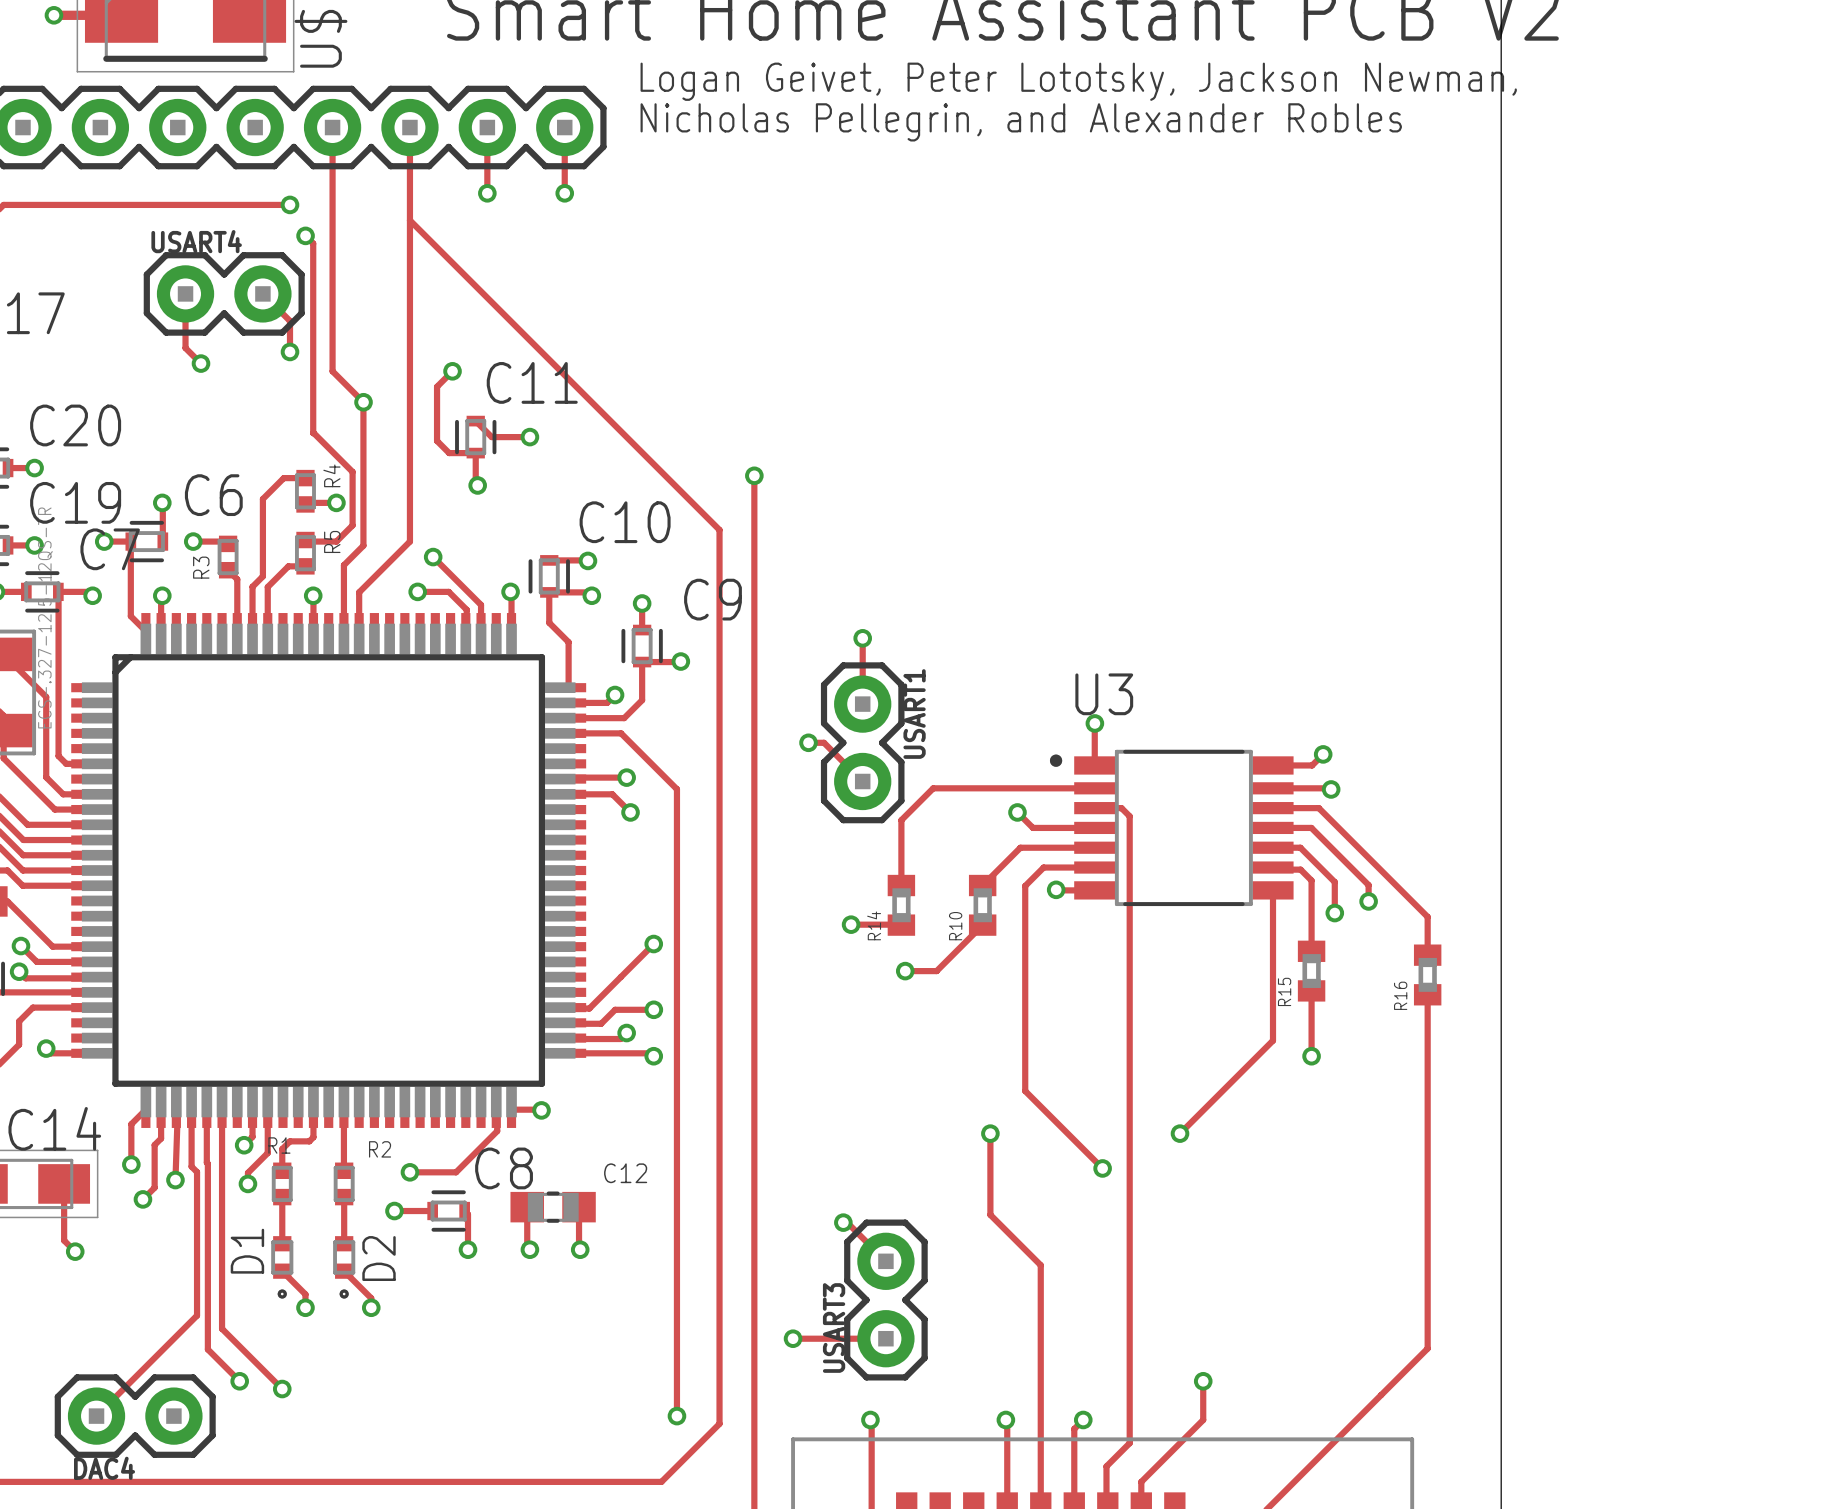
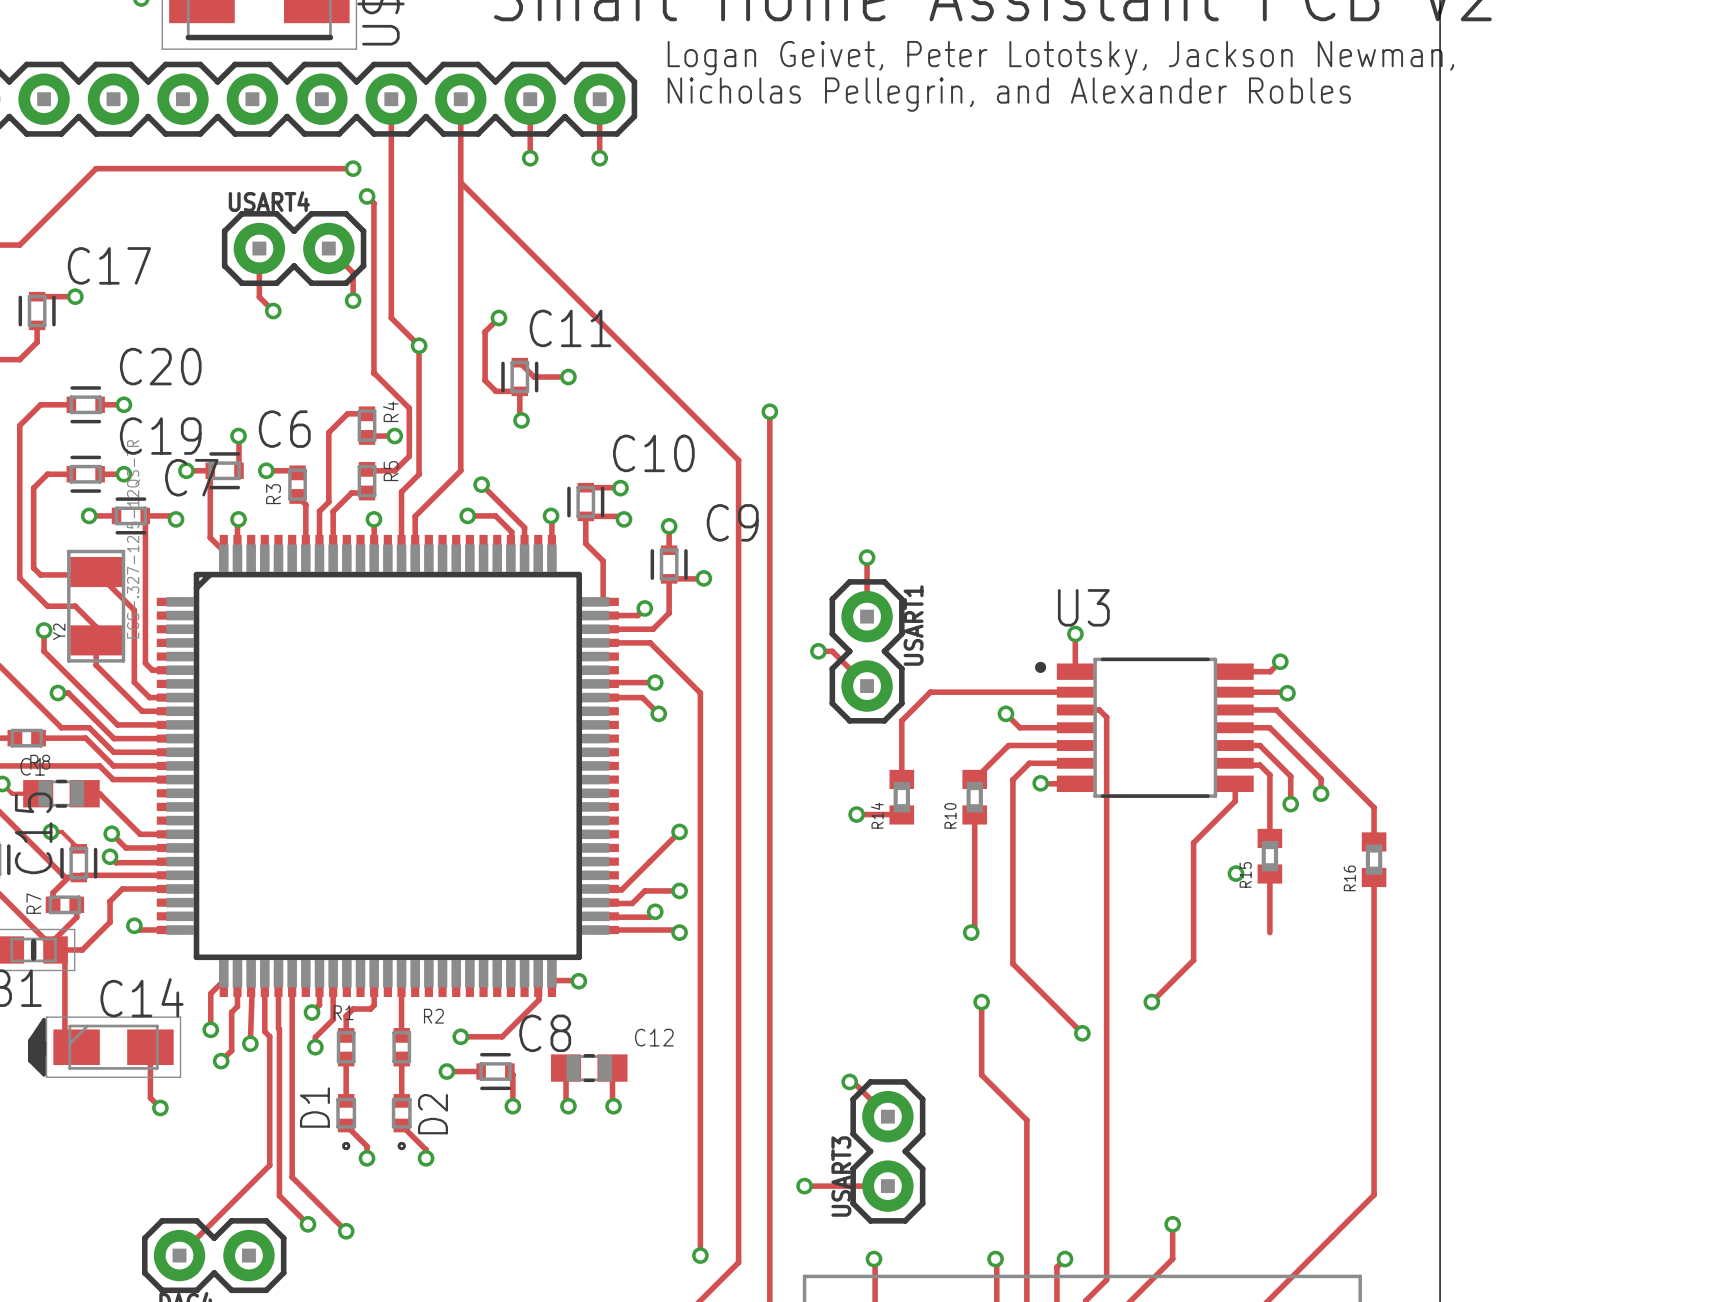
track: (1273, 909) (1273, 1040) (1226, 1087) -> (1235, 801) (1193, 842) (1193, 960)
track: (982, 925) (936, 971) (905, 971) -> (974, 814) (974, 929) (971, 932)
via position: (905, 971) -> (971, 932)
via position: (1311, 1056) -> (1235, 873)

